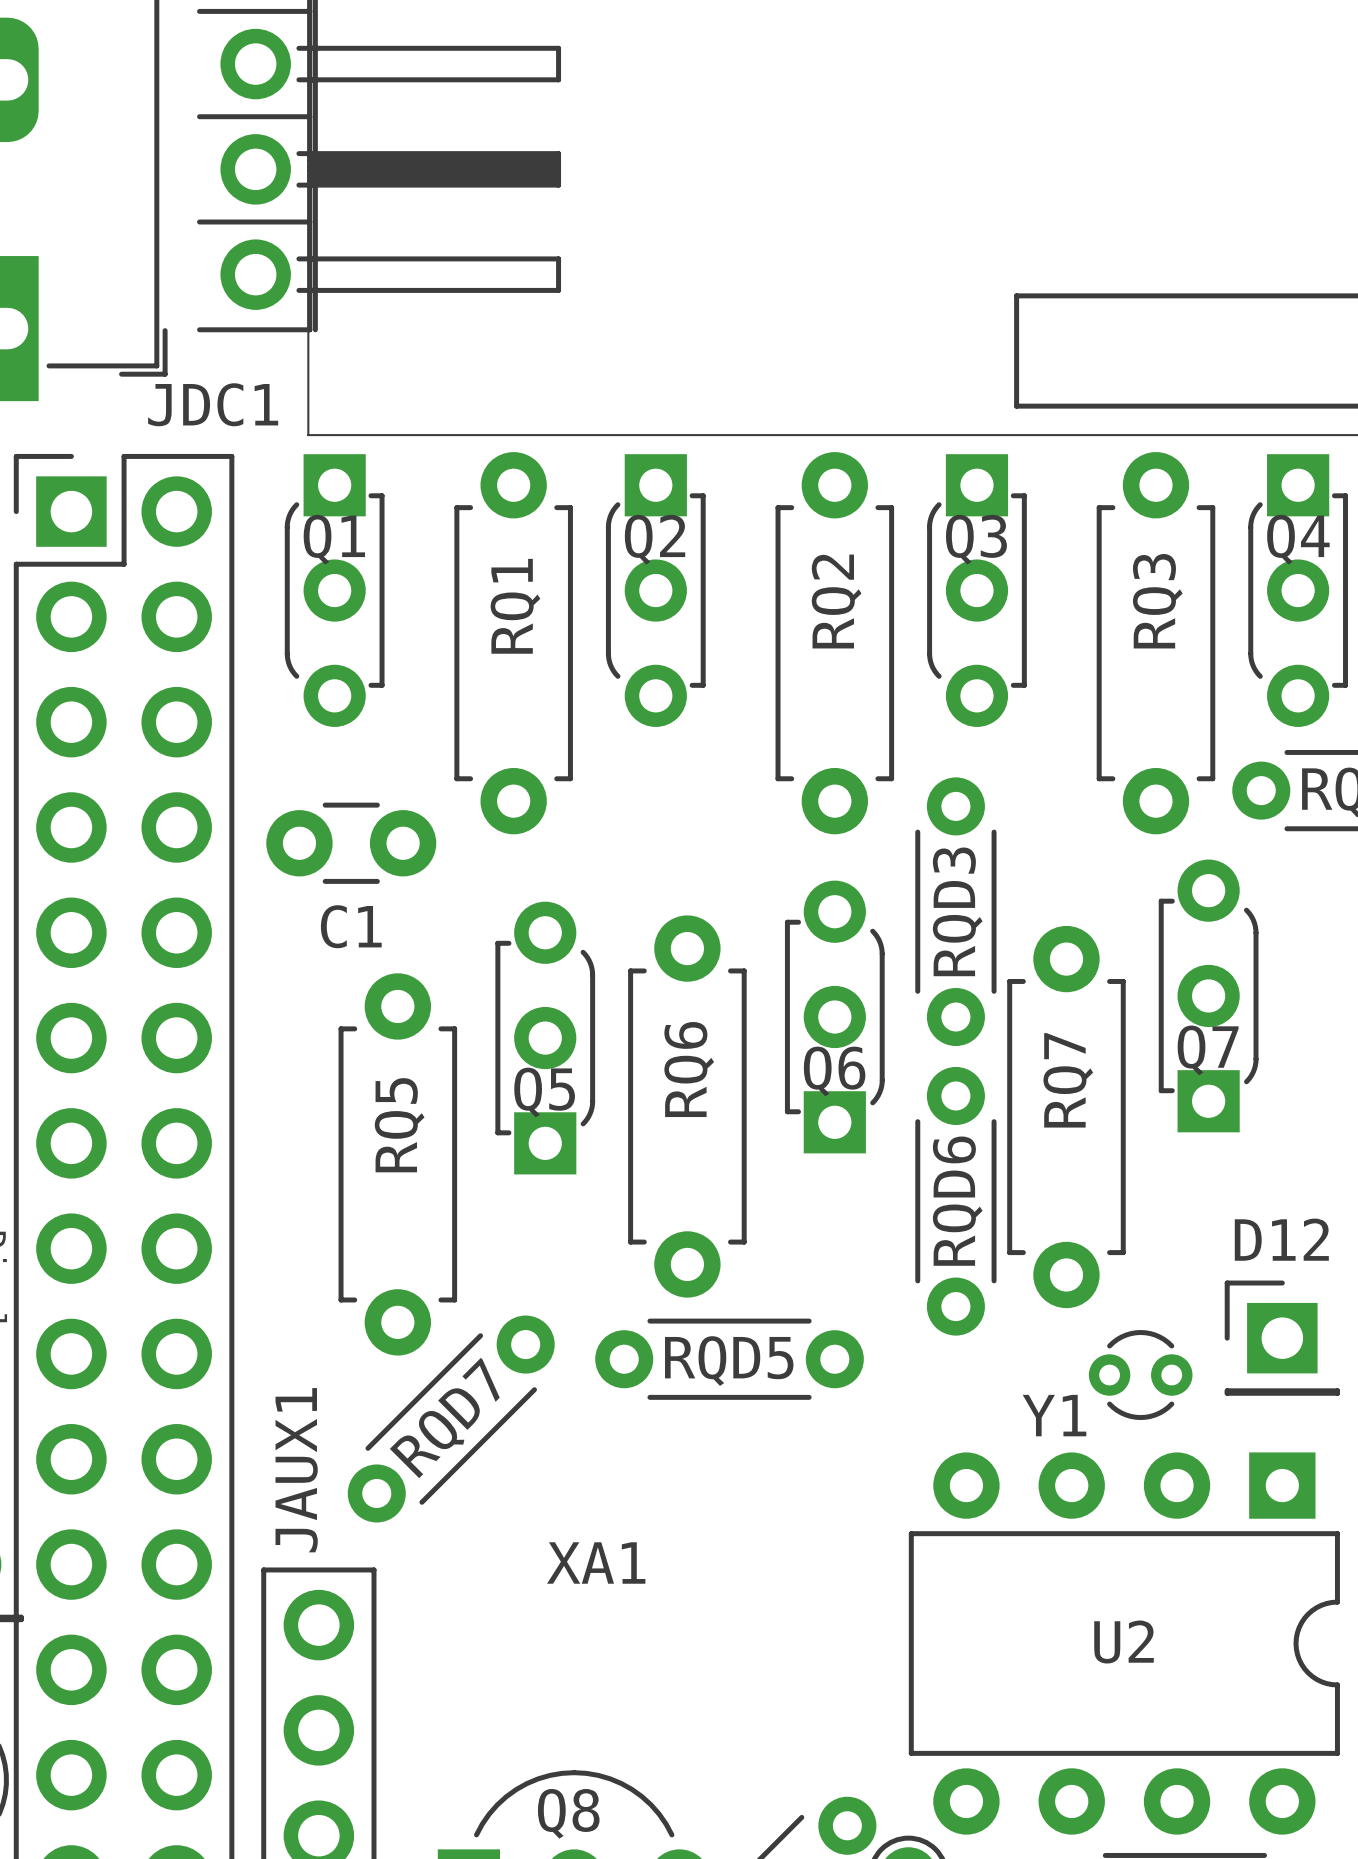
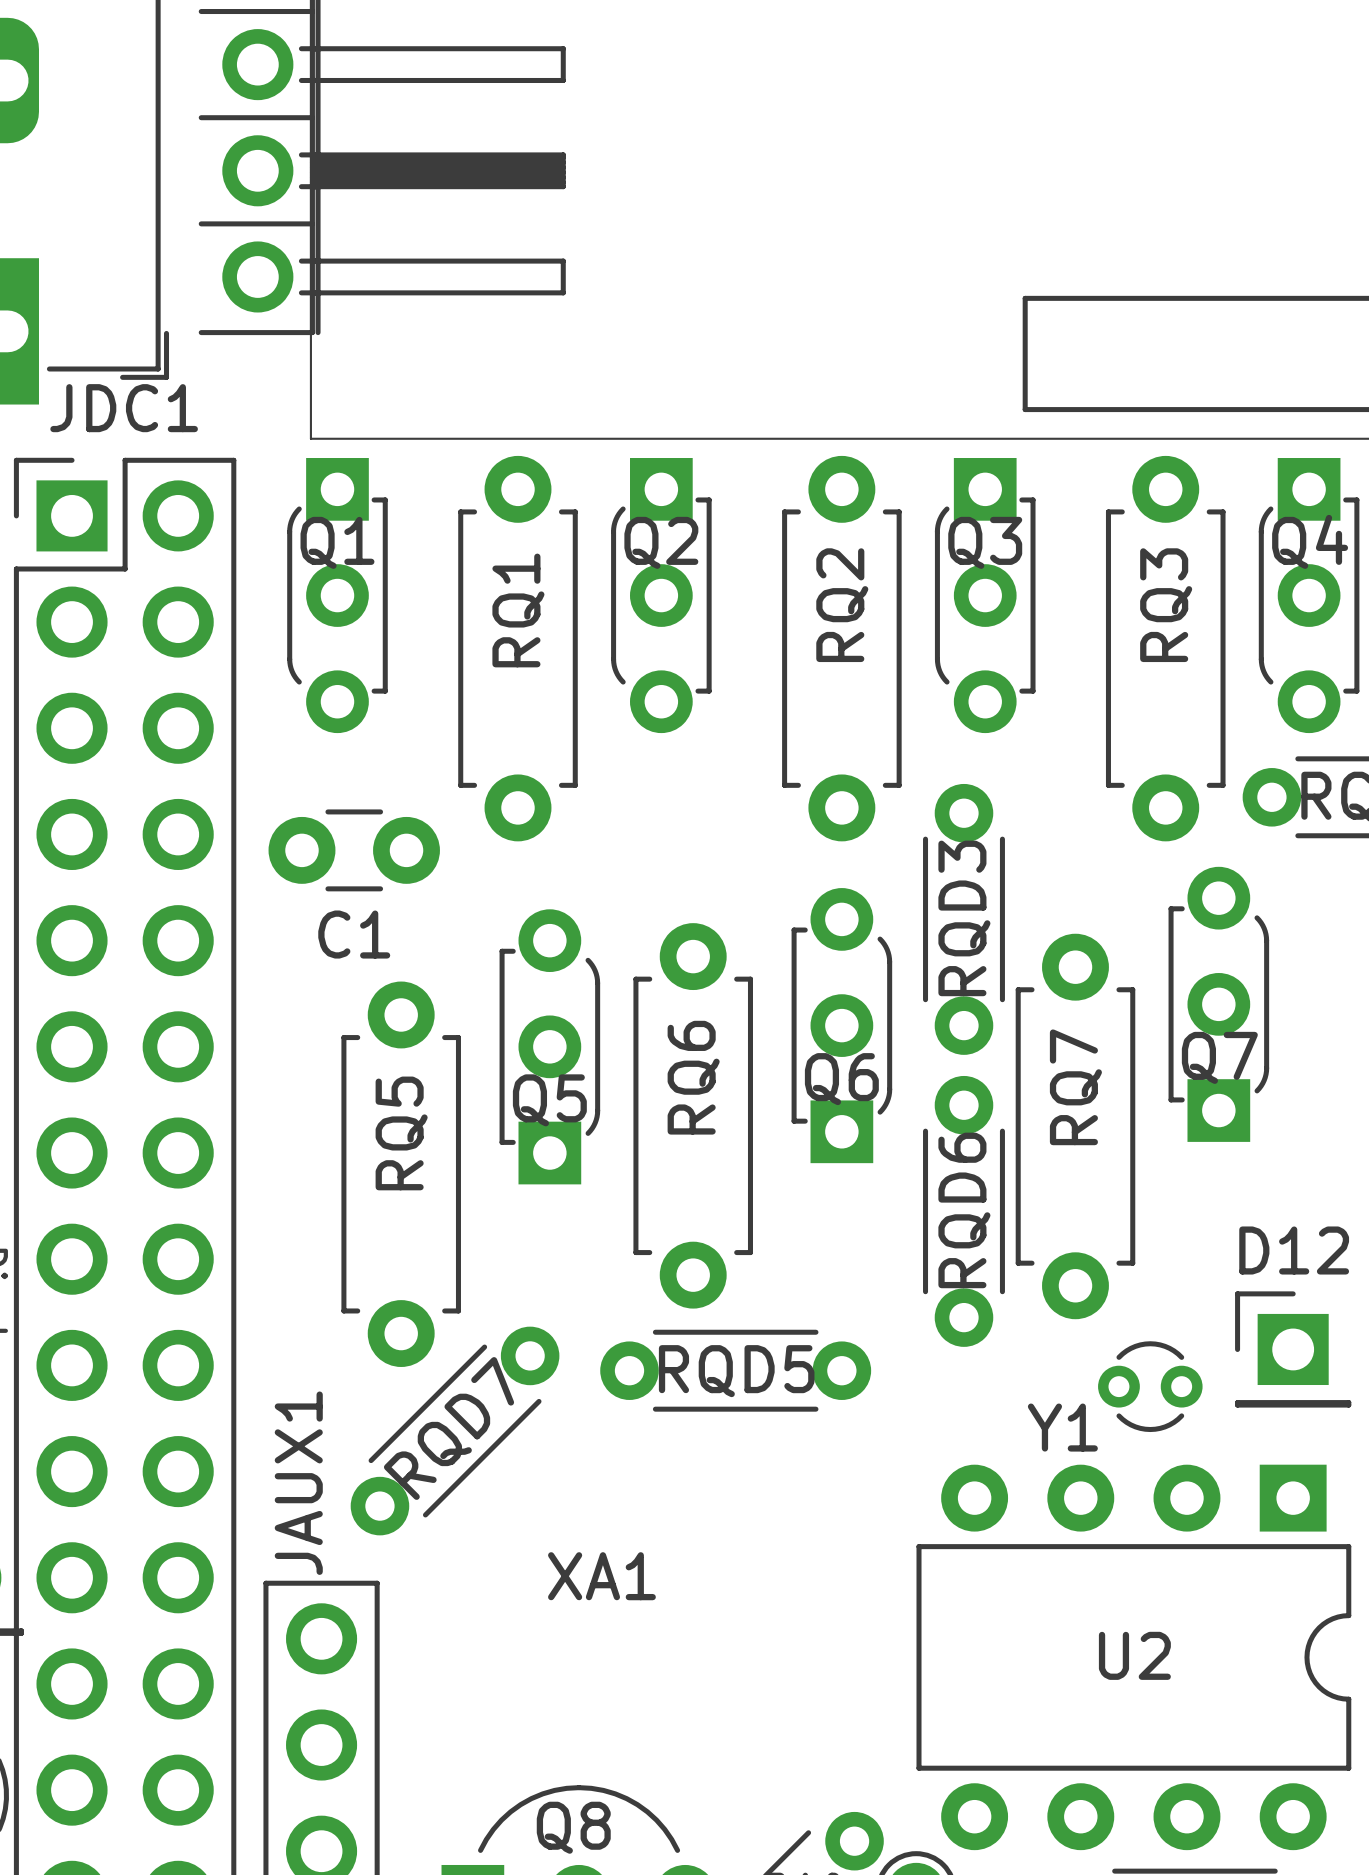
JDC1 name position: JDC1 (213, 404) -> JDC1 (124, 408)

